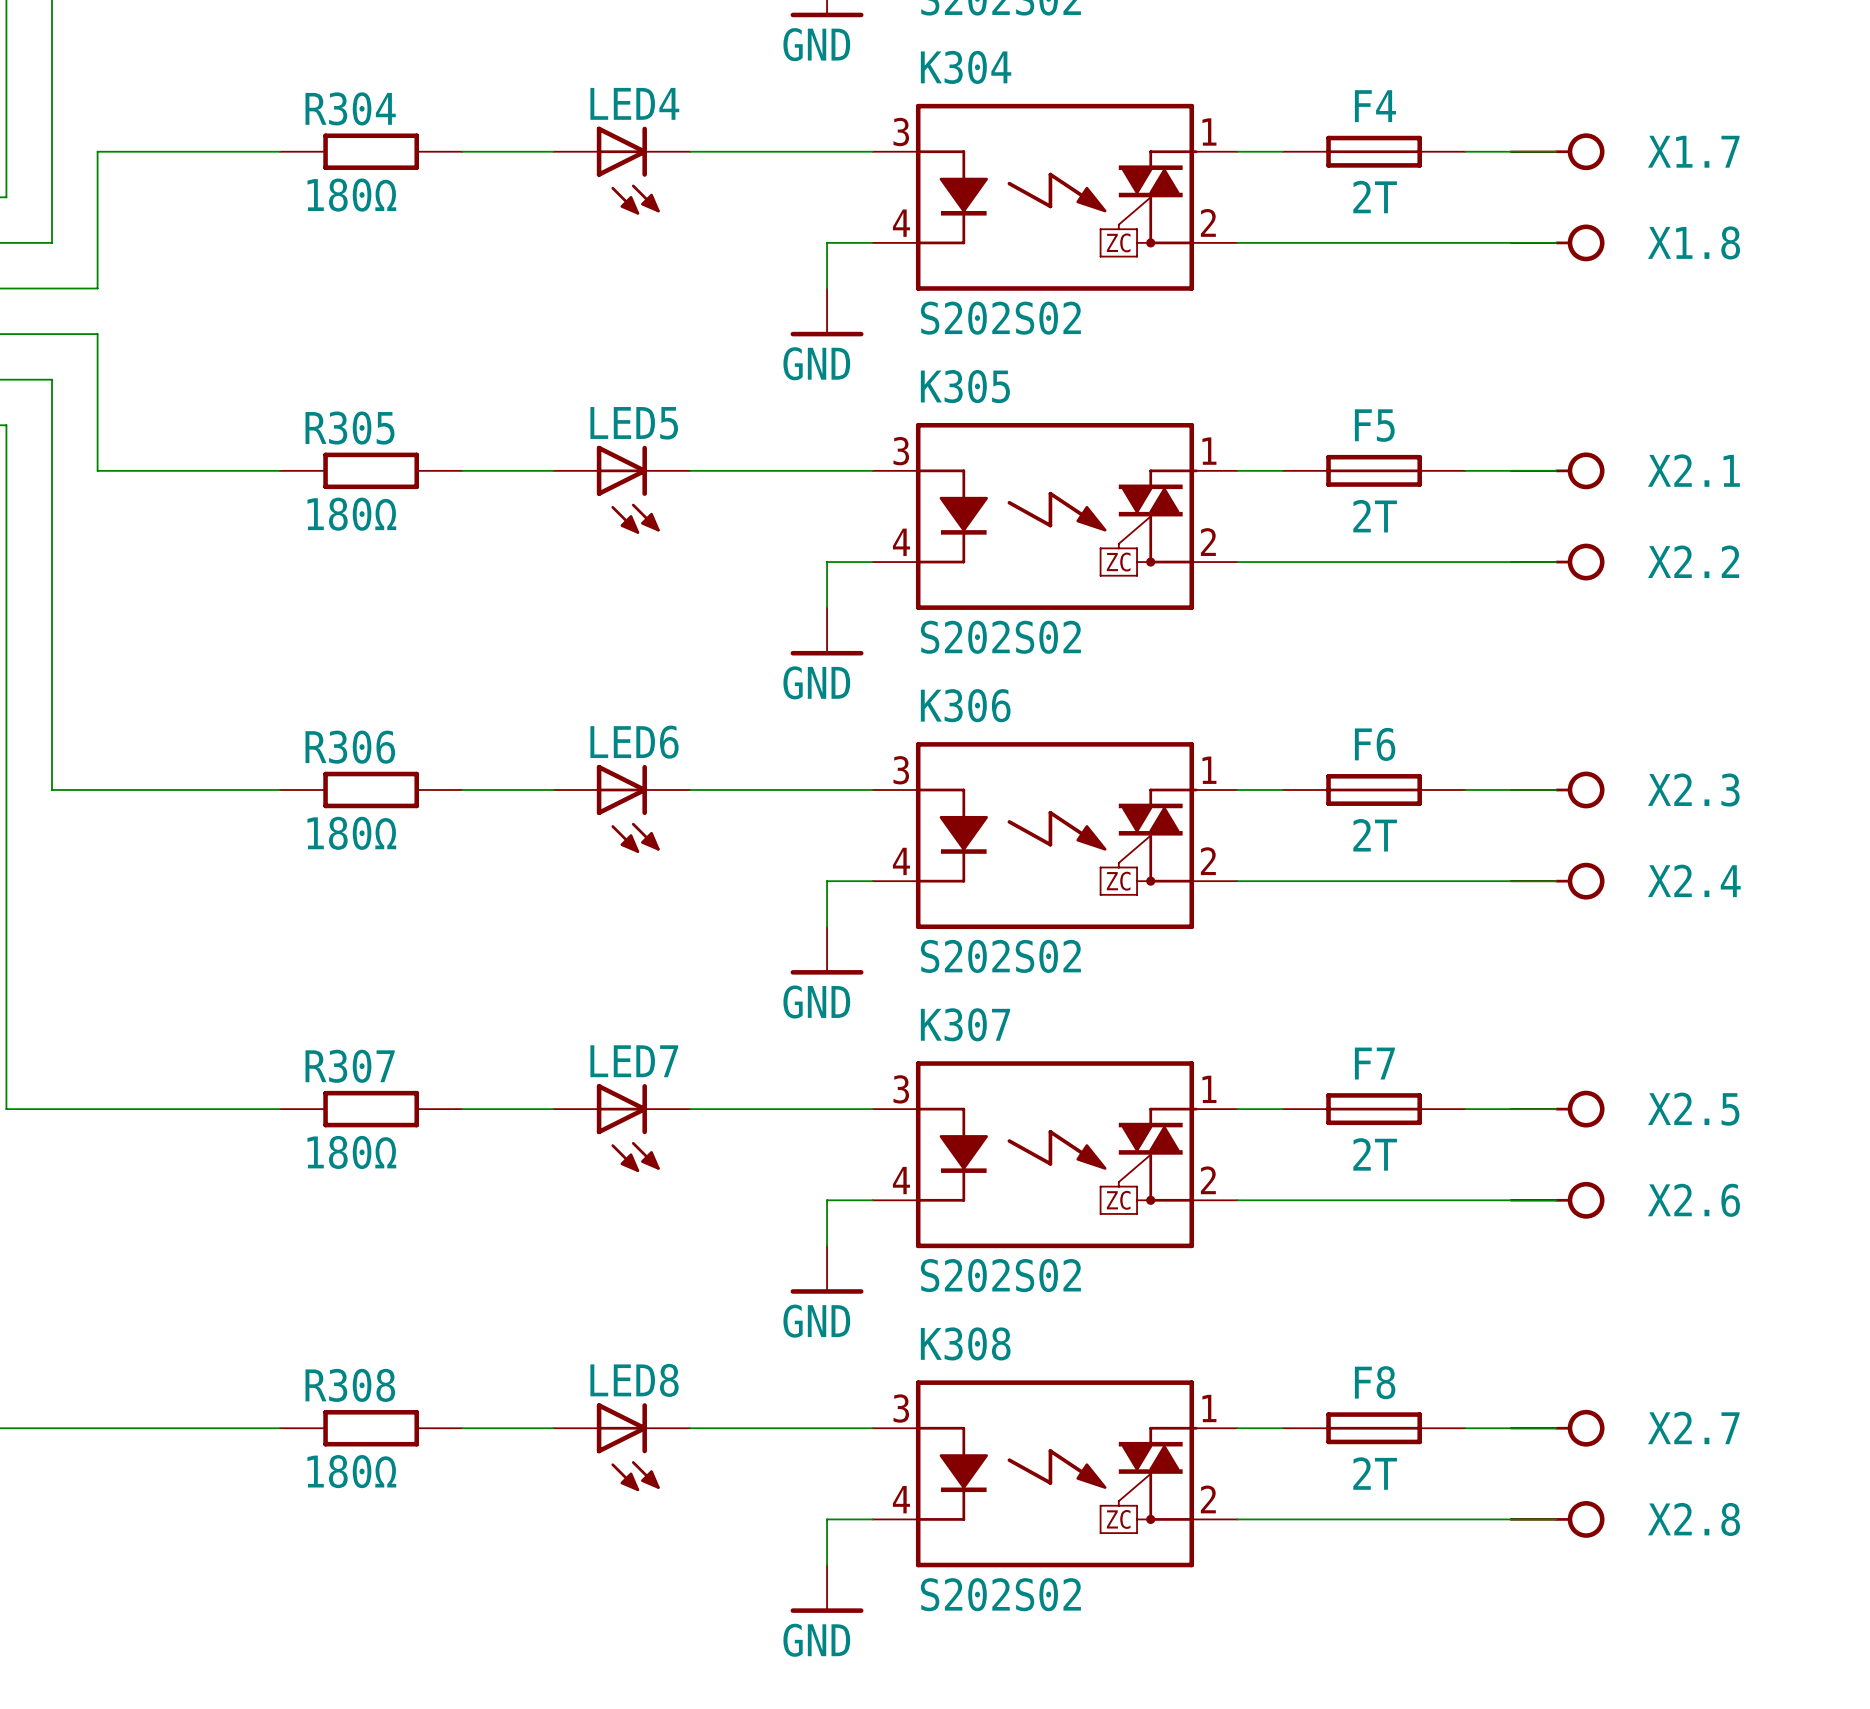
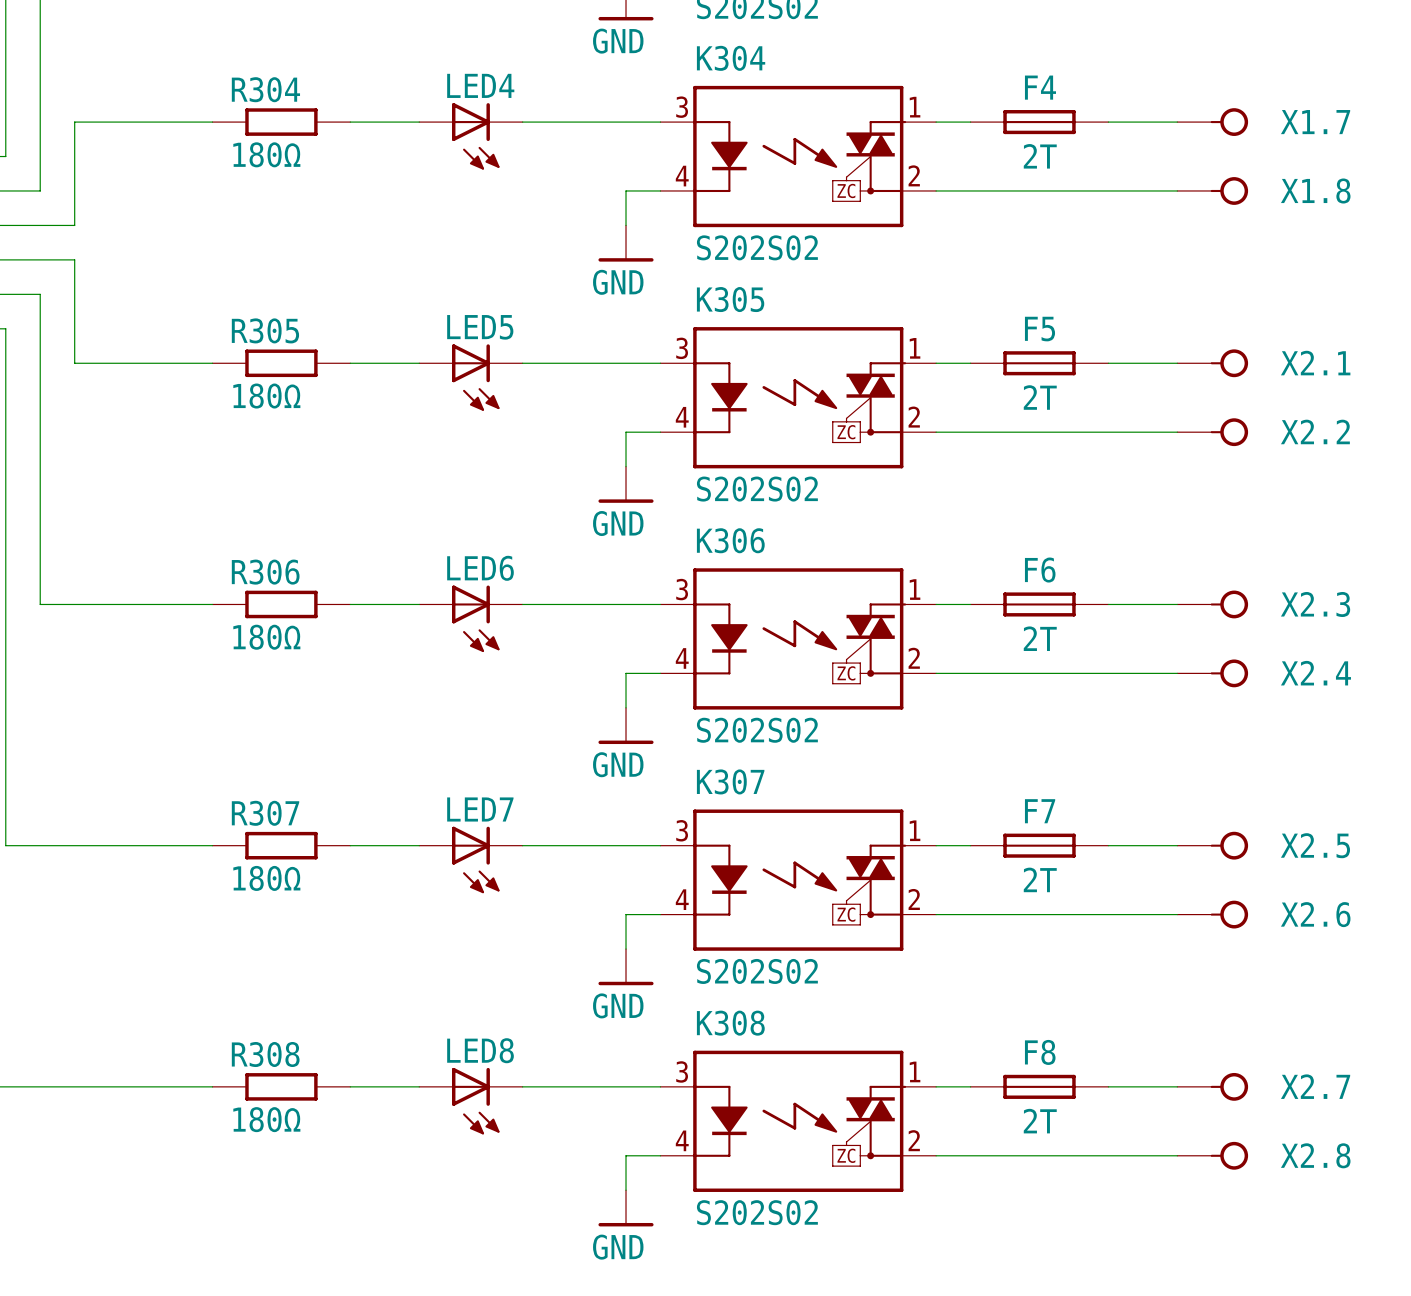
X1.7 position: (1557, 151) -> (1212, 122)
X1.8 position: (1557, 242) -> (1212, 190)
X2.1 position: (1557, 470) -> (1212, 363)
X2.2 position: (1557, 562) -> (1212, 432)
X2.3 position: (1557, 789) -> (1212, 604)
X2.4 position: (1557, 881) -> (1212, 673)
X2.5 position: (1557, 1109) -> (1212, 845)
X2.6 position: (1557, 1200) -> (1212, 914)
X2.7 position: (1557, 1428) -> (1212, 1086)
X2.8 position: (1557, 1519) -> (1212, 1155)

